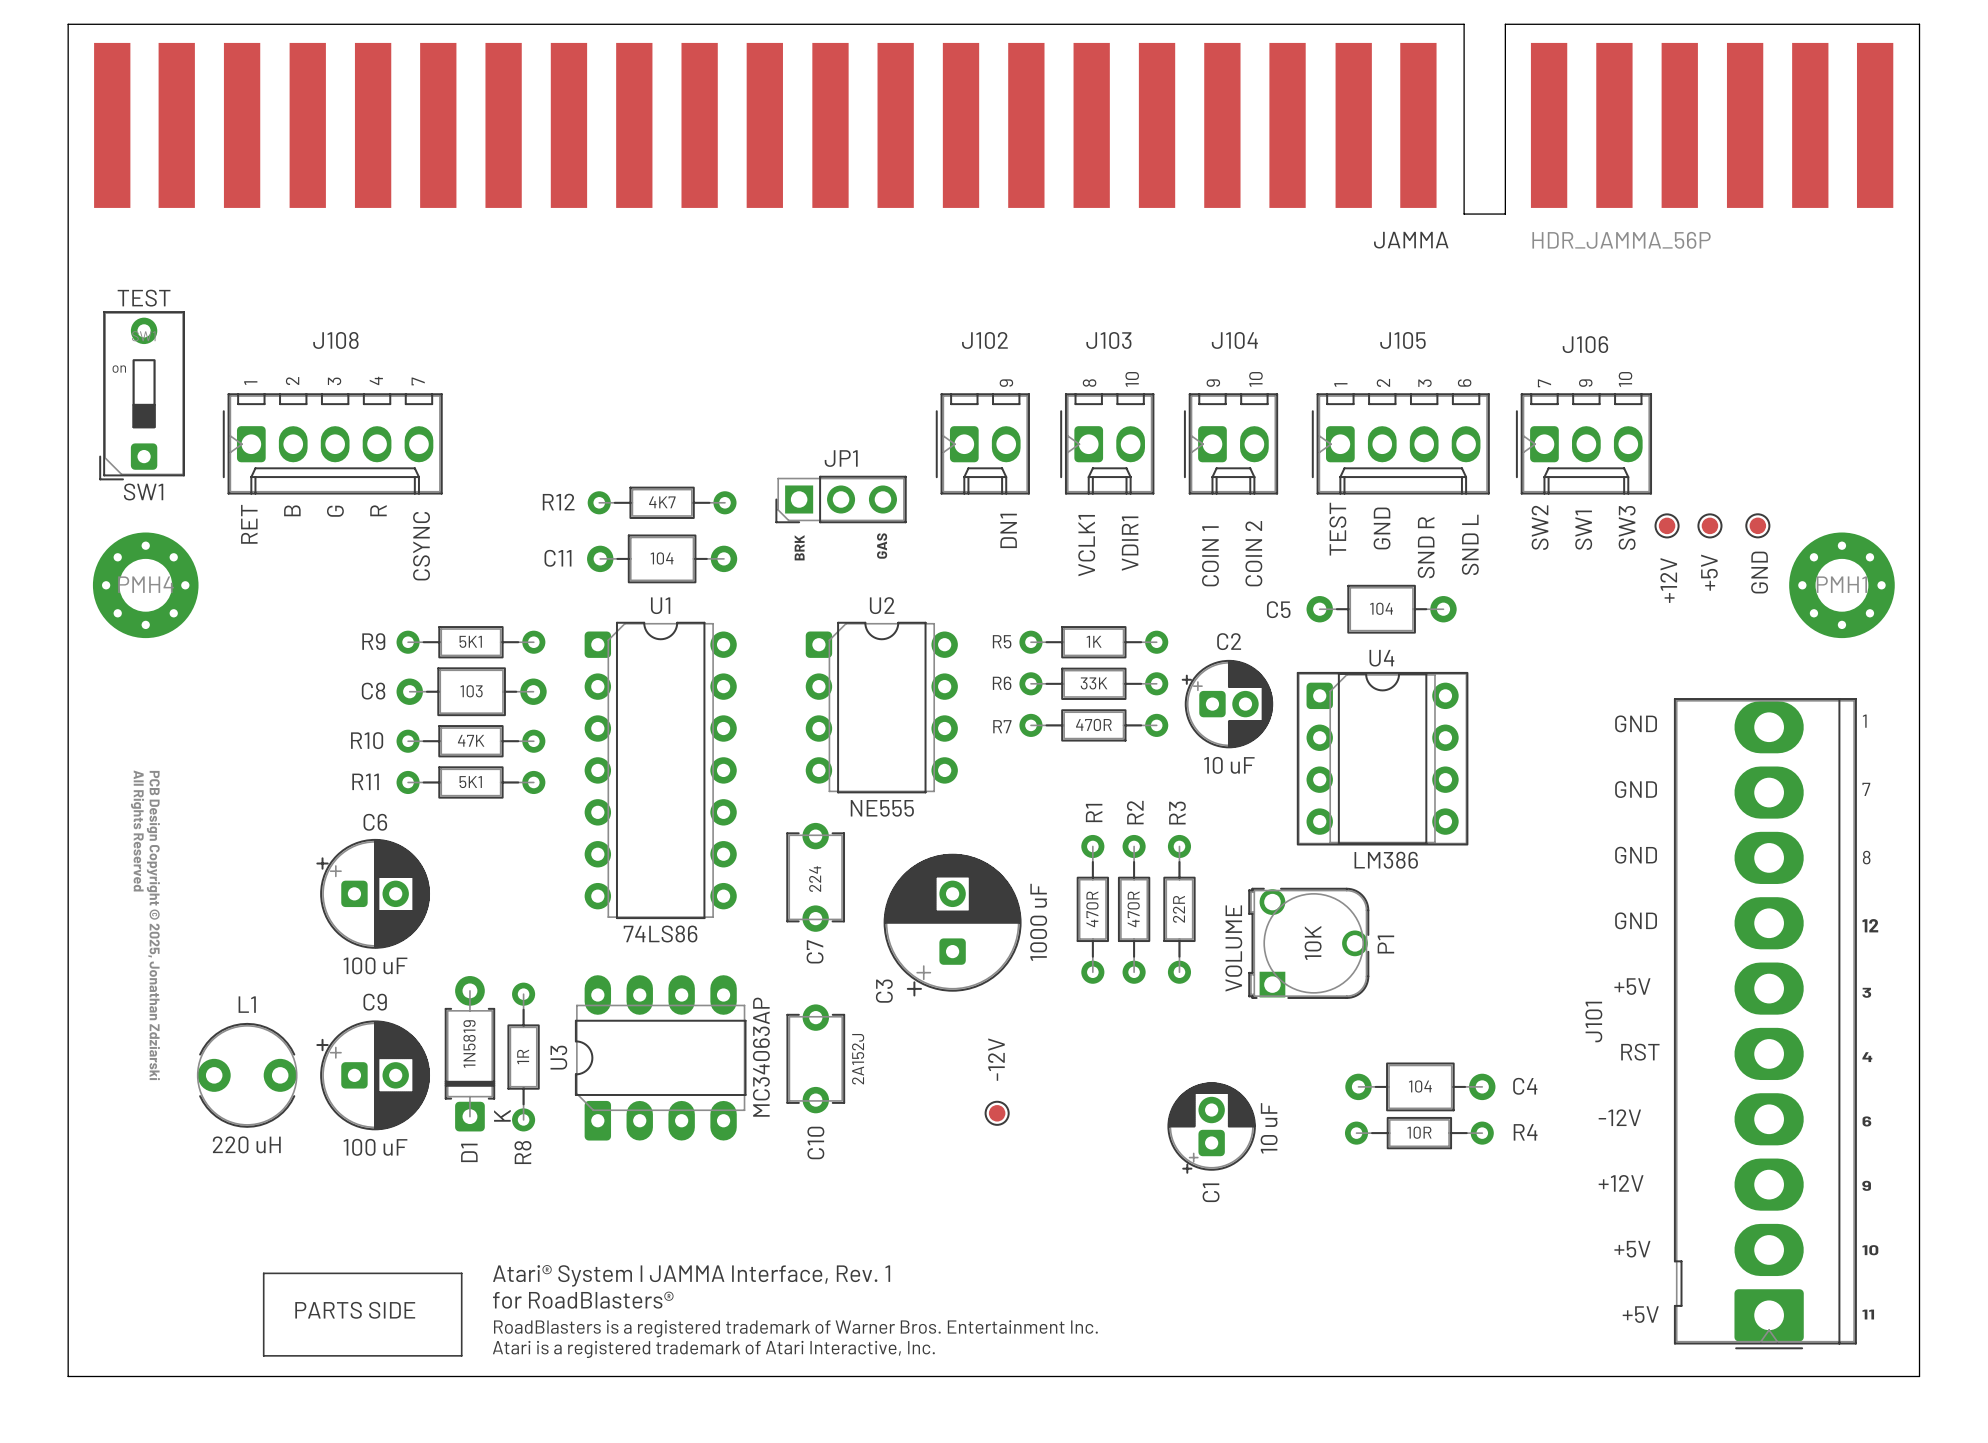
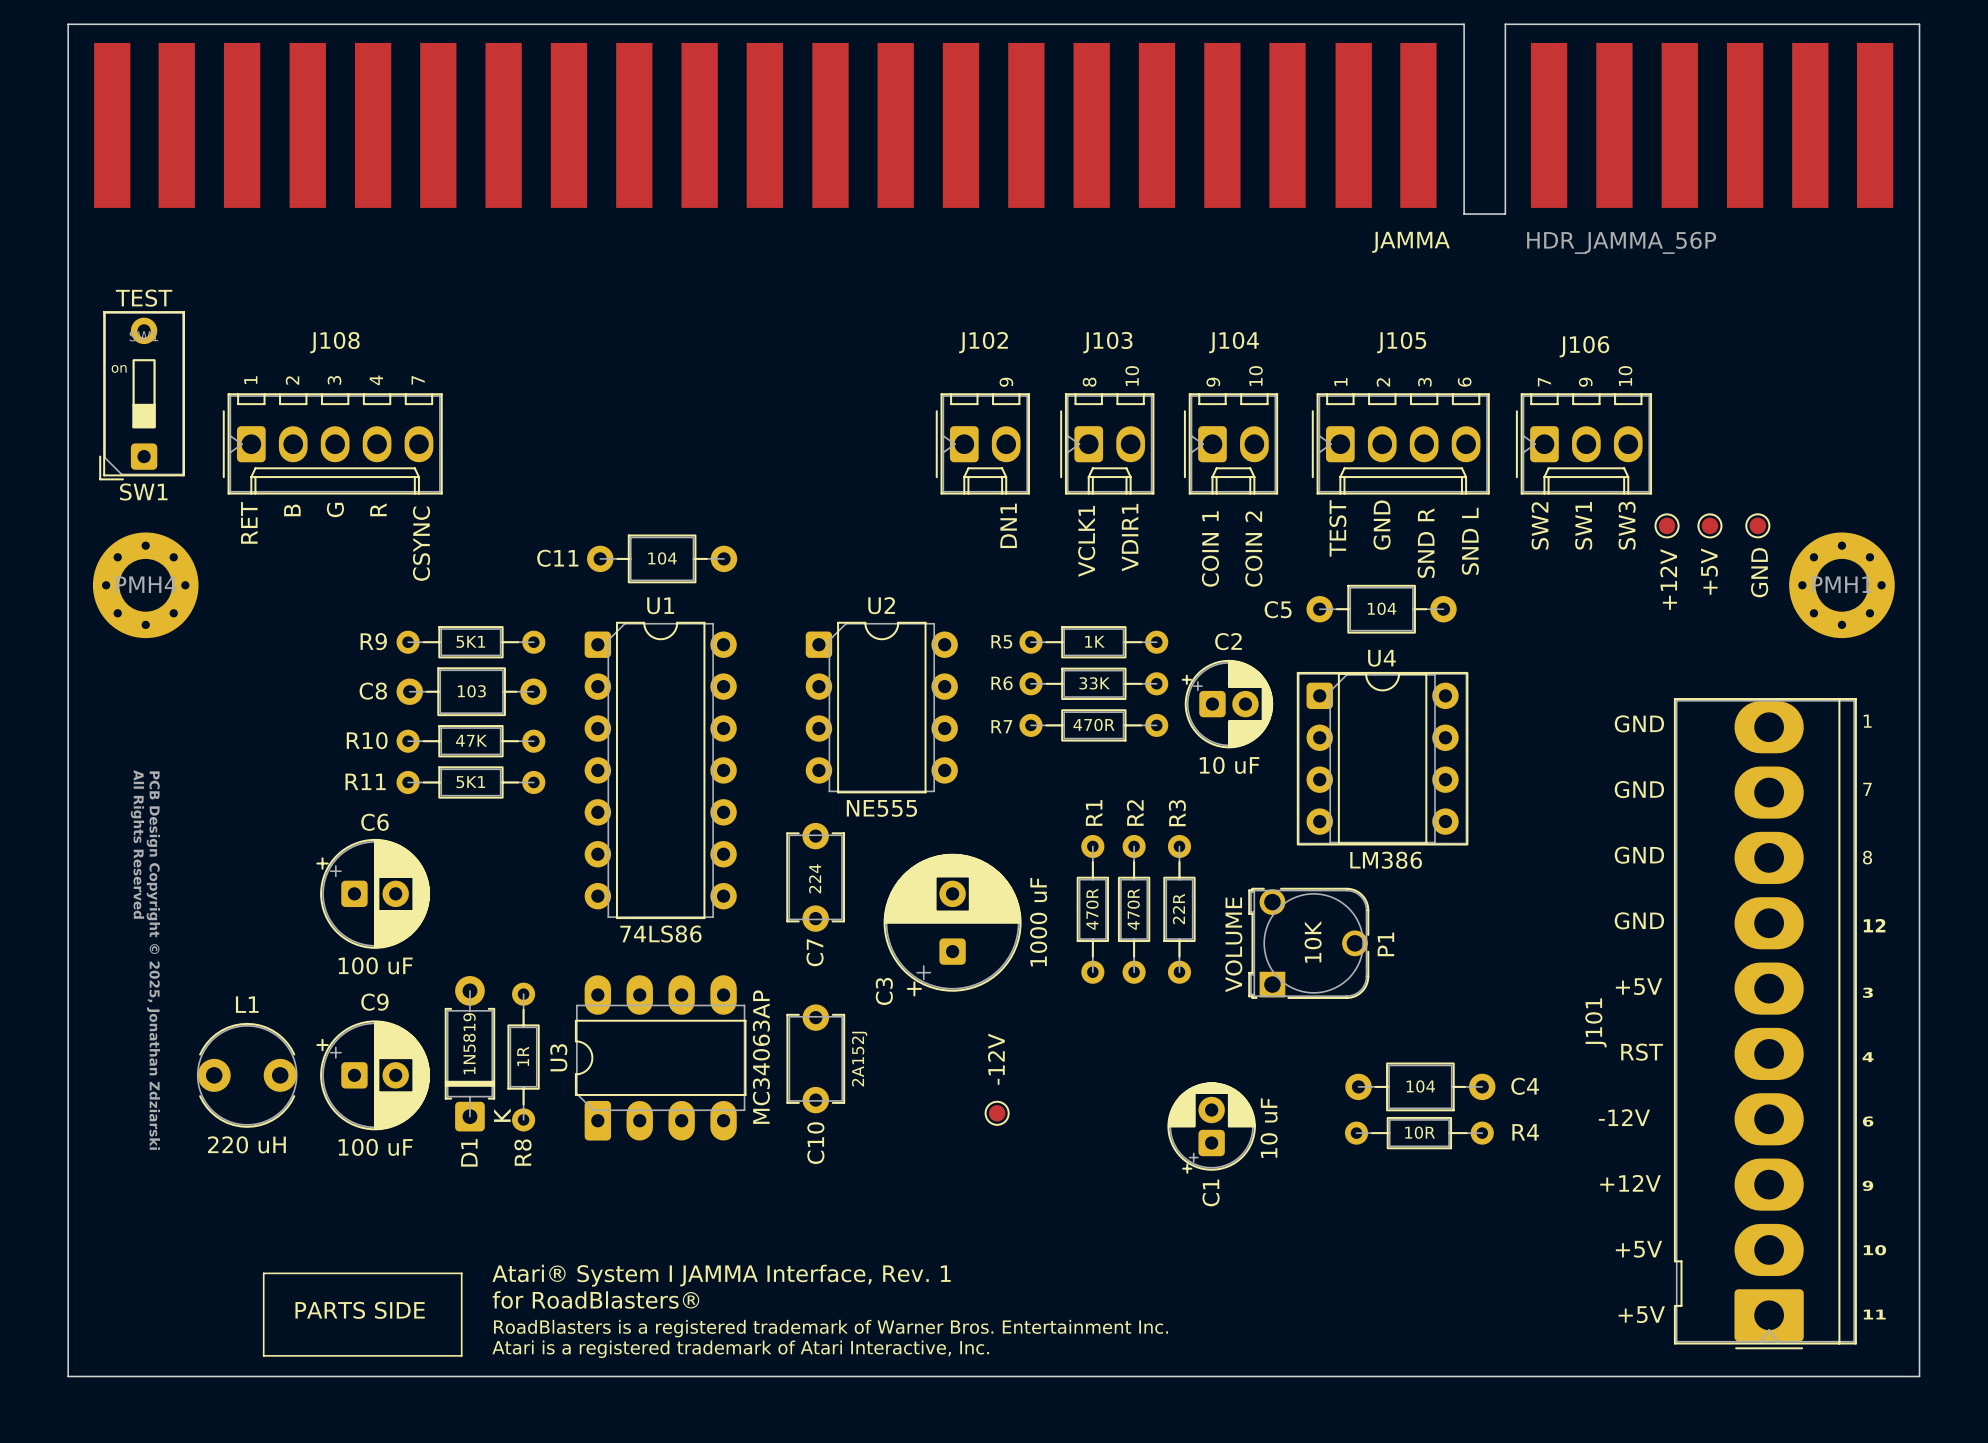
JP1: (841, 499) -> none
R12: 4K7 (662, 502) -> none
text: GAS (882, 546) -> none
text: BRK (799, 547) -> none

